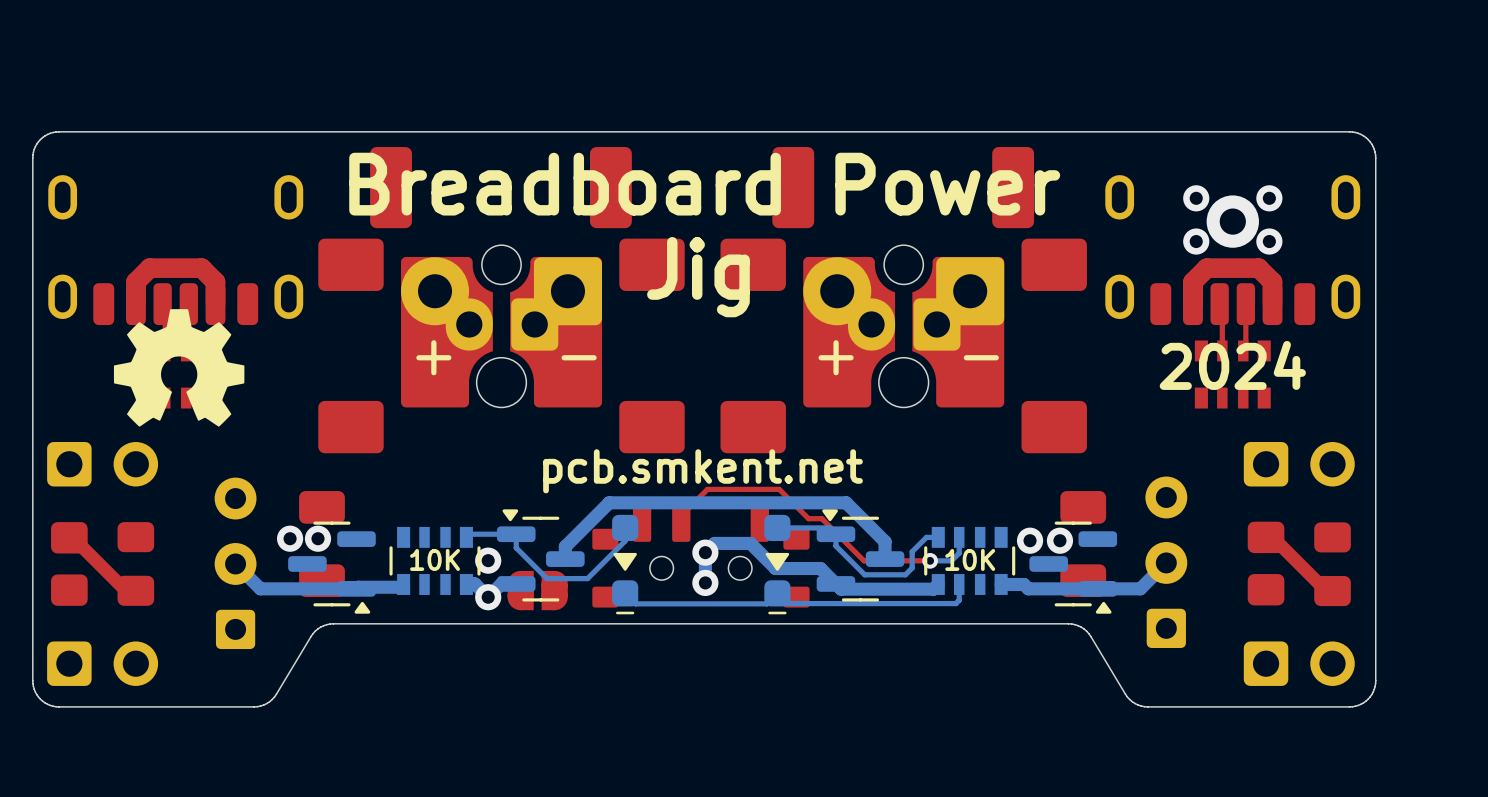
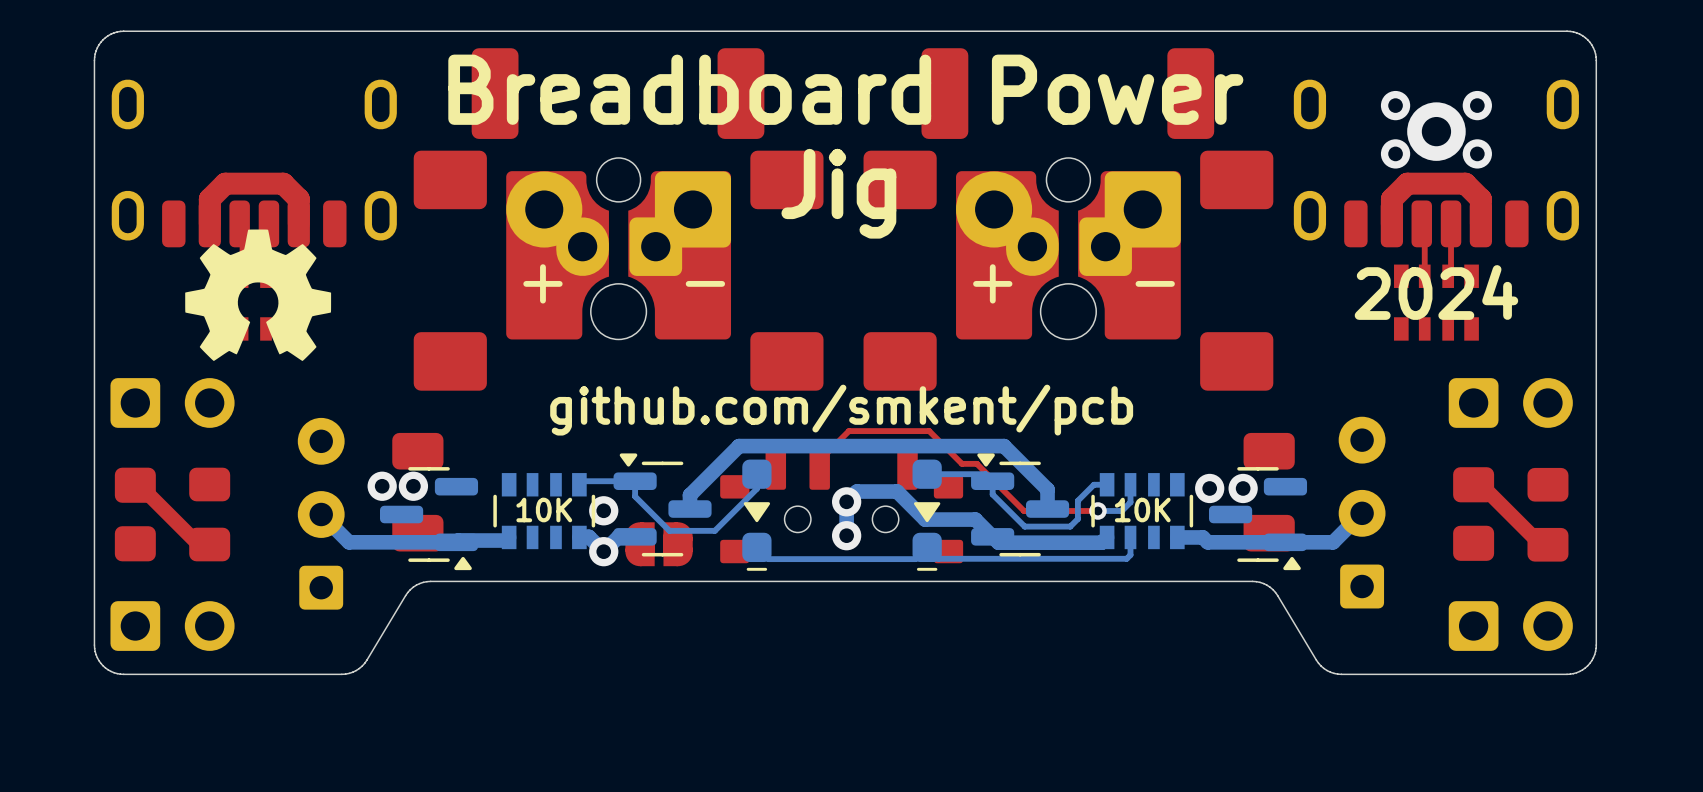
text: pcb.smkent.net (703, 471) -> github.com/smkent/pcb (841, 410)

